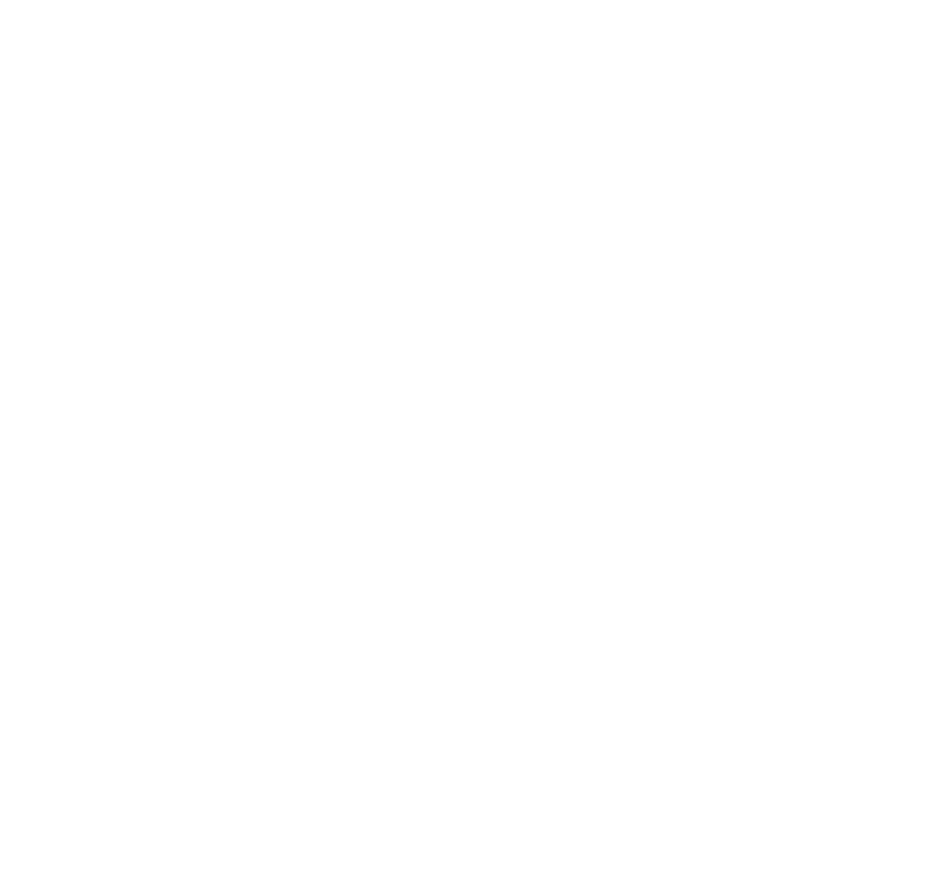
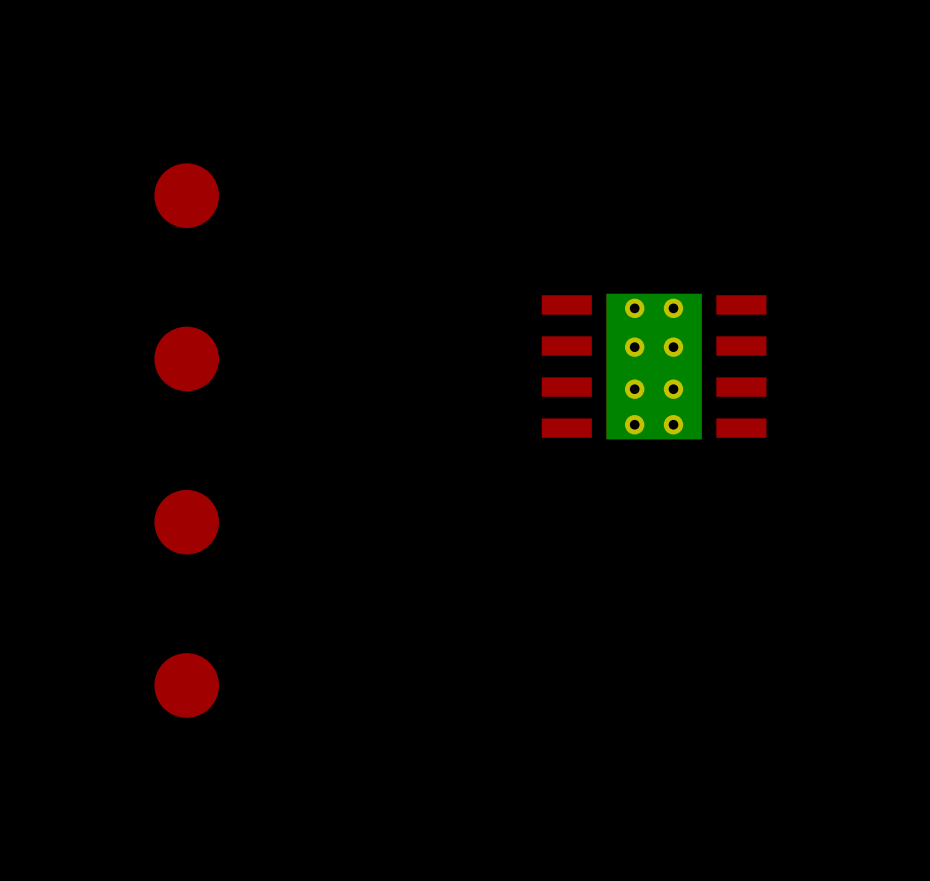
part: none -> (186, 195)
part: none -> (186, 358)
part: none -> (654, 366)
part: none -> (186, 522)
part: none -> (186, 685)

